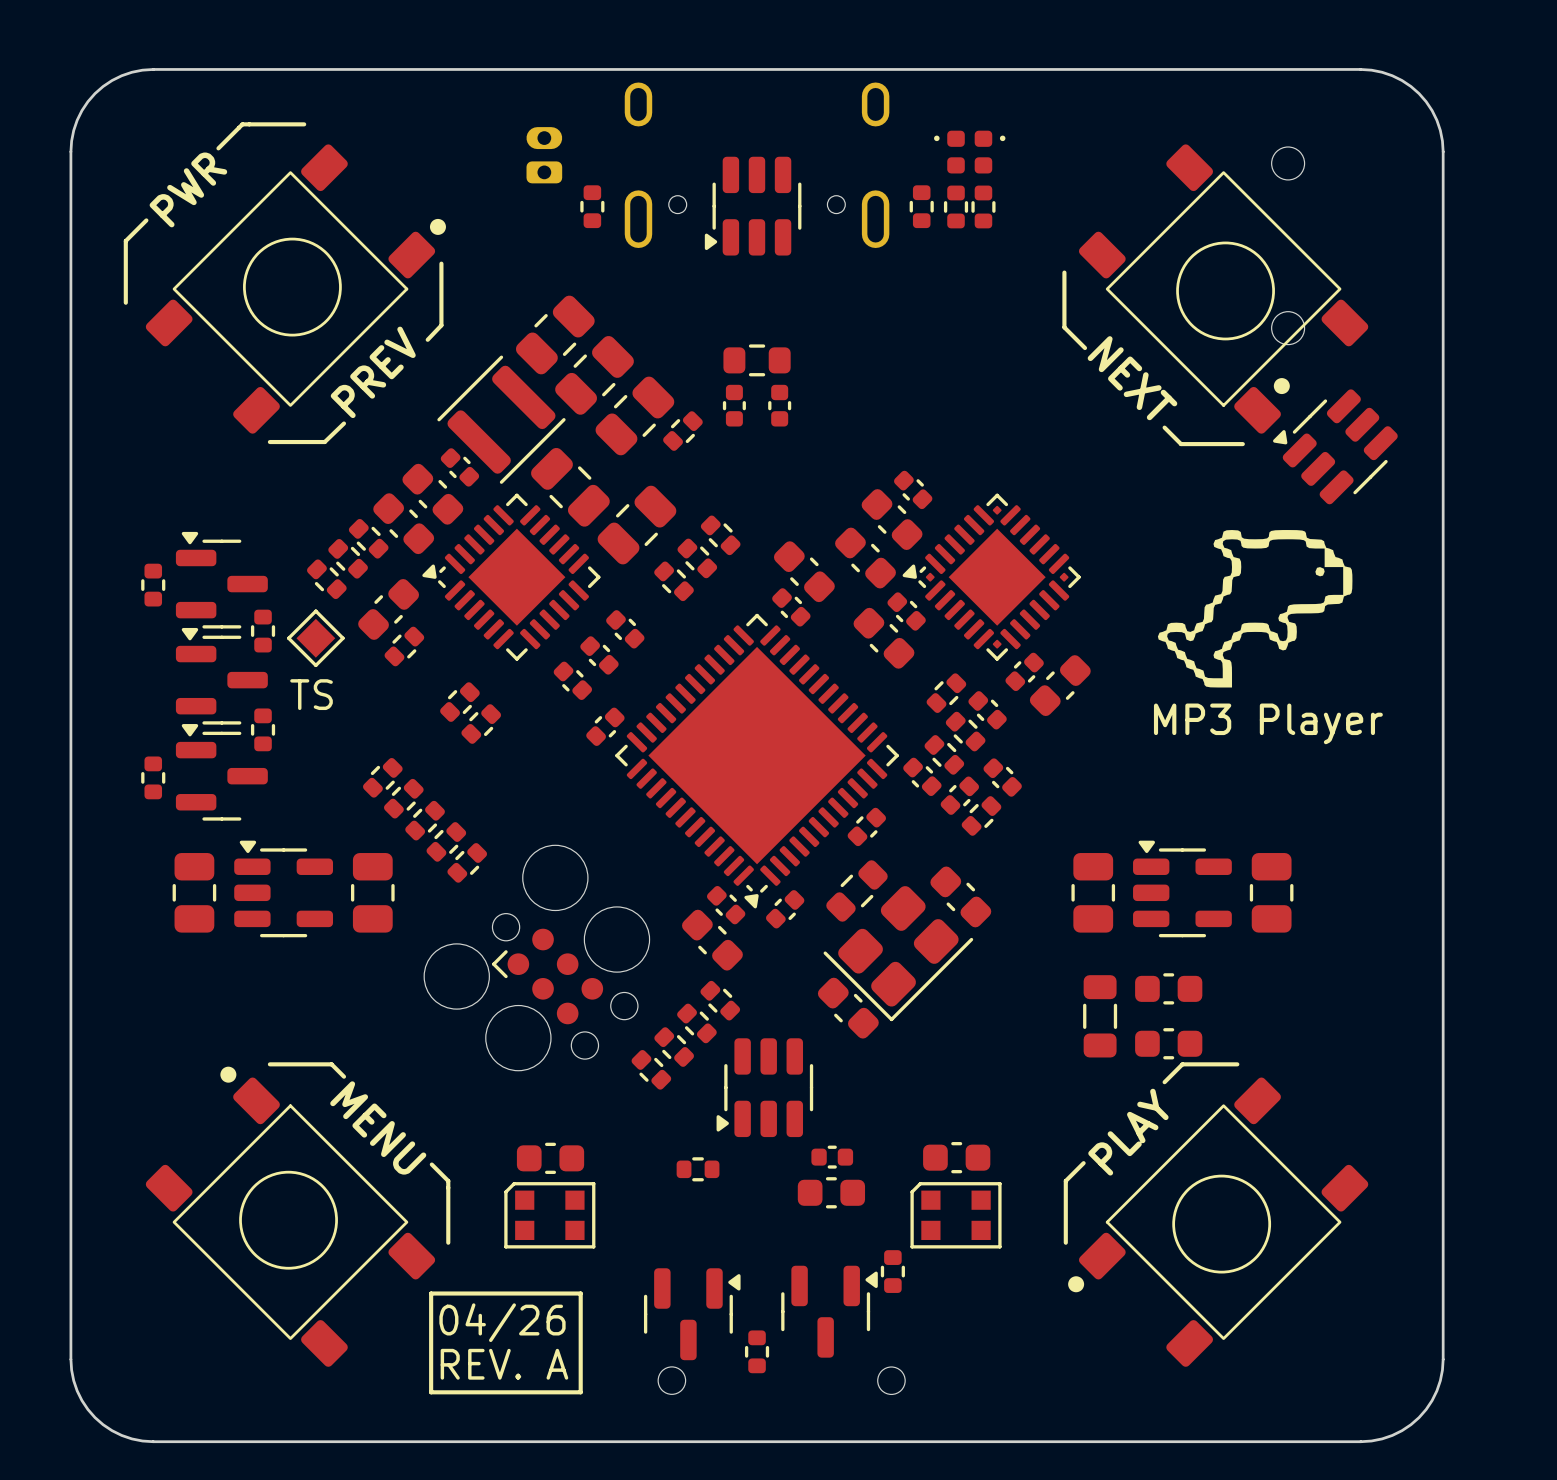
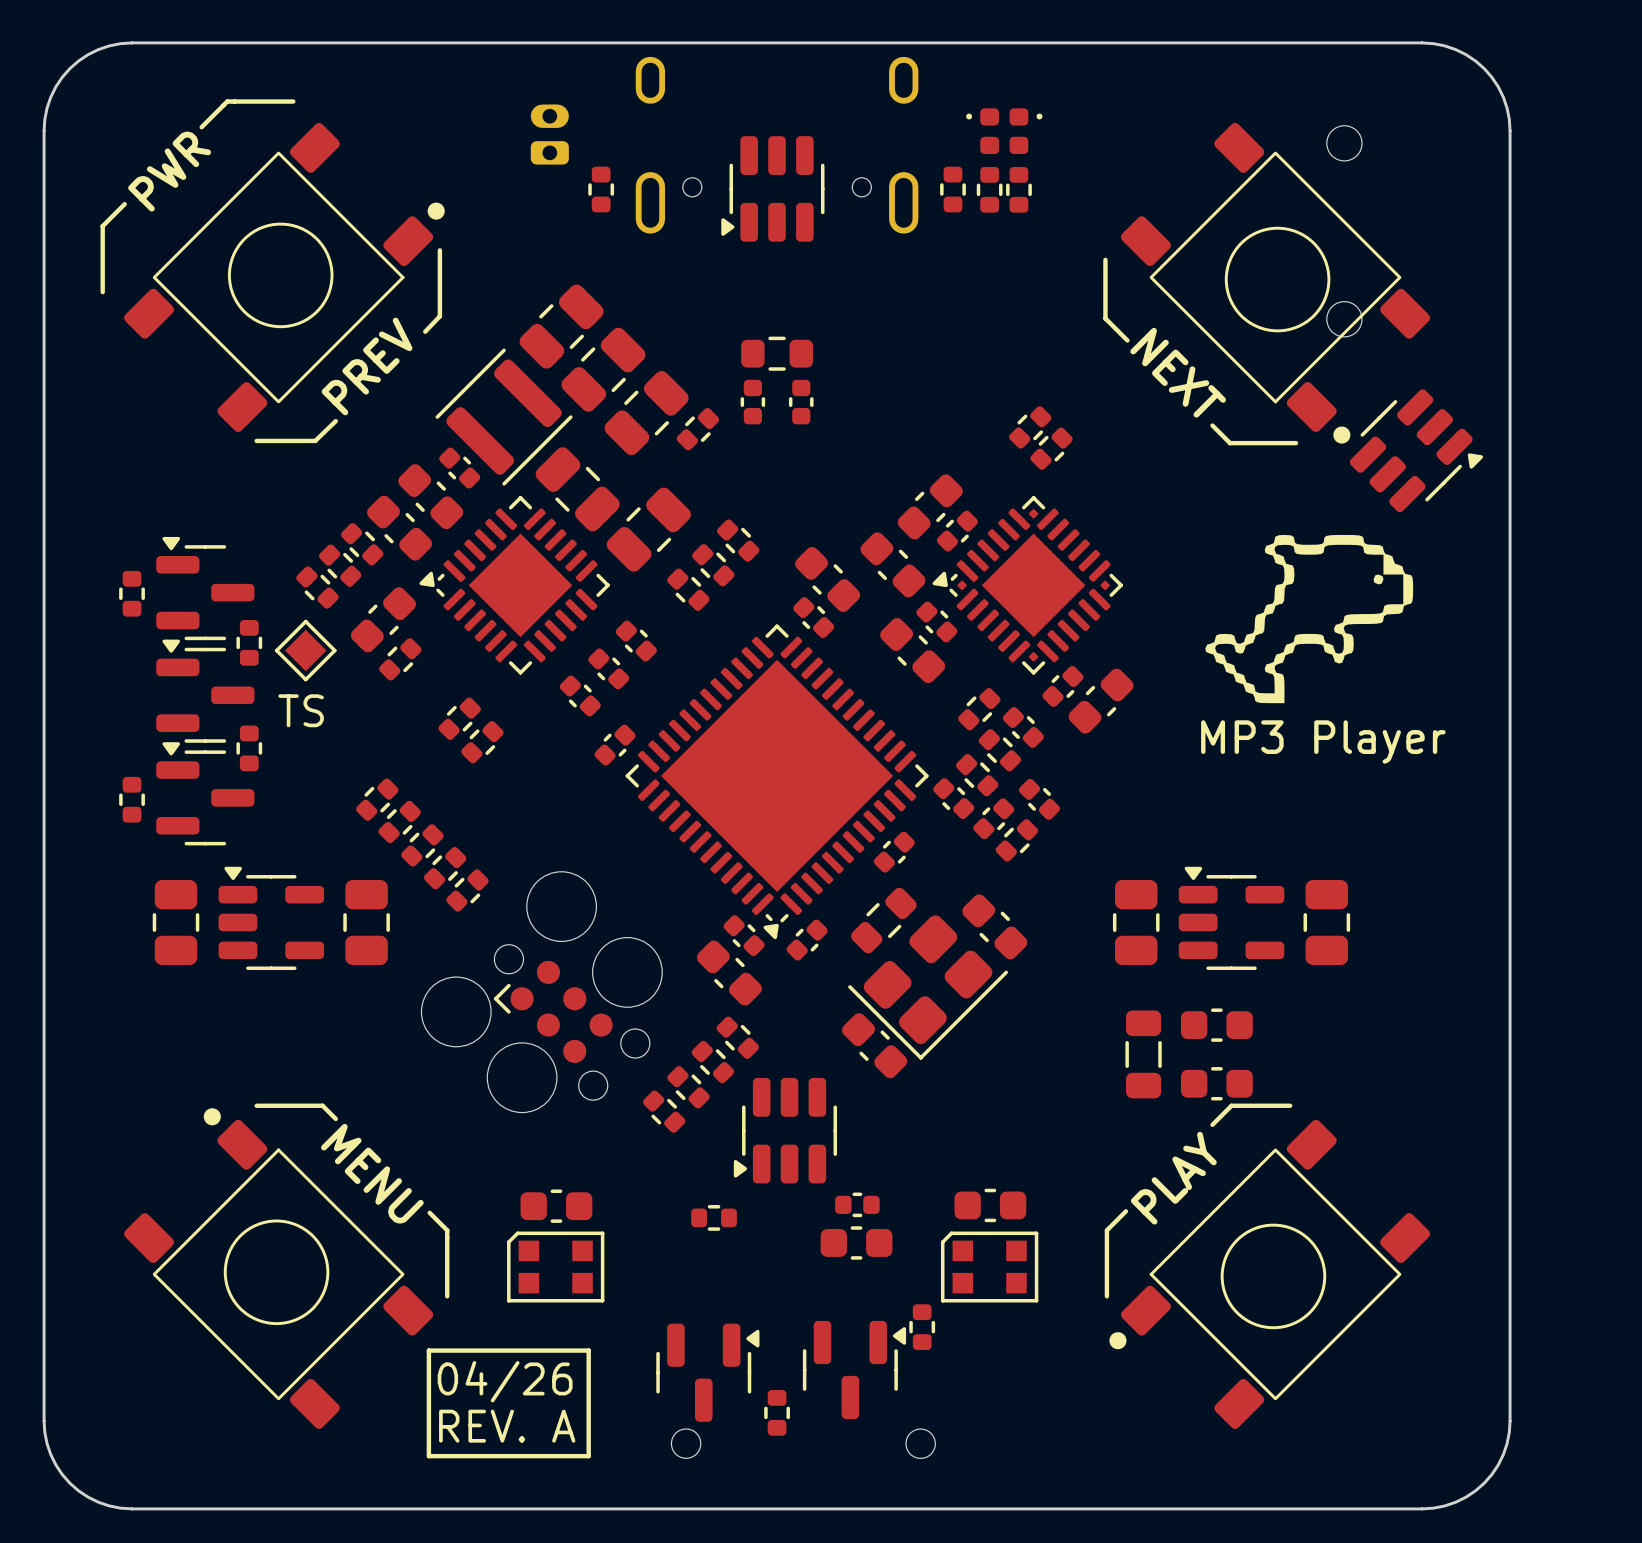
part footprint: [1078, 144, 1369, 434] -> [1120, 122, 1431, 444]
part: none -> (1030, 427)
part rotation: 0° (1335, 446) -> 180° (1416, 450)
part: none -> (1051, 448)
part rotation: 0° (913, 489) -> 90° clockwise (957, 531)
part position: (913, 489) -> (957, 531)
part rotation: 0° (892, 519) -> 90° clockwise (930, 506)

